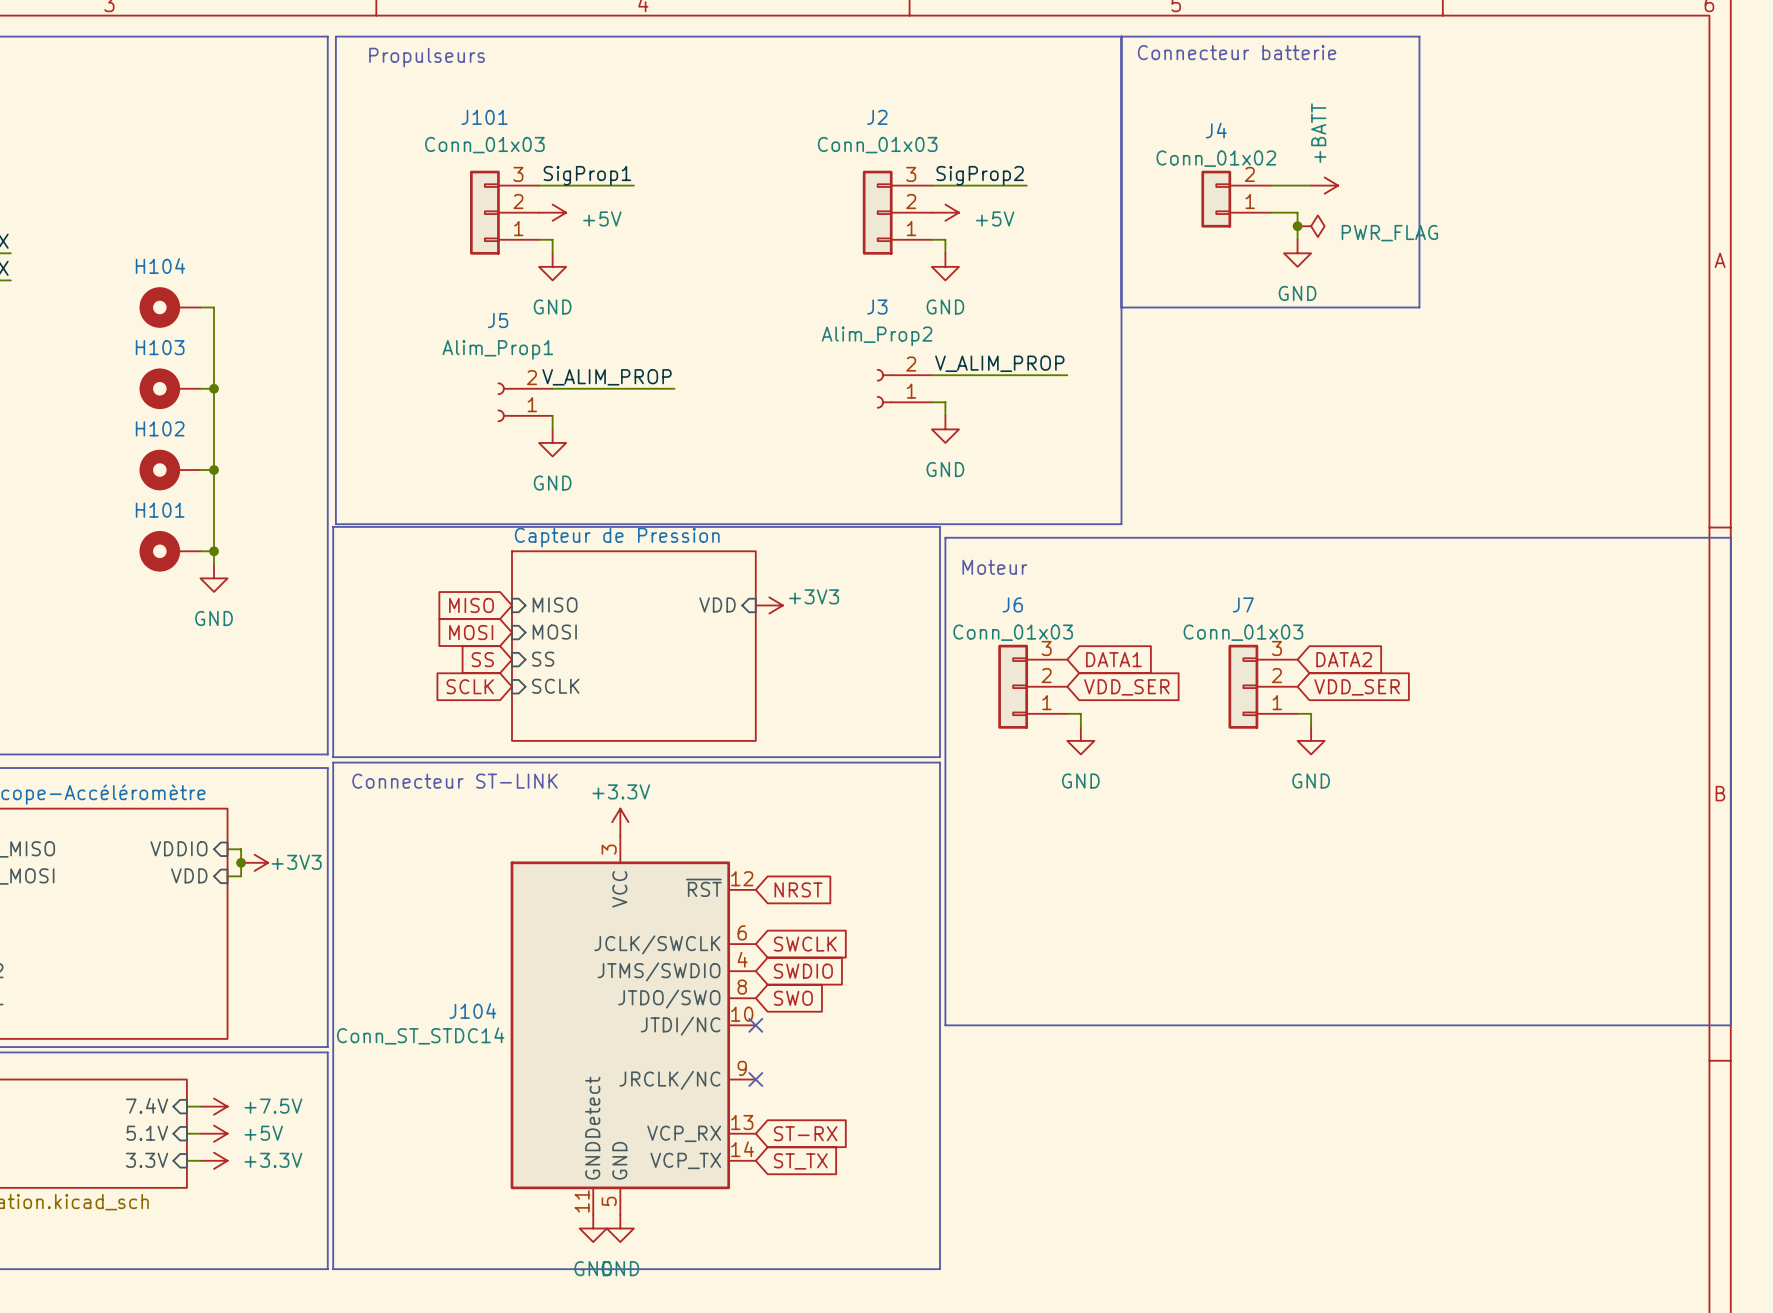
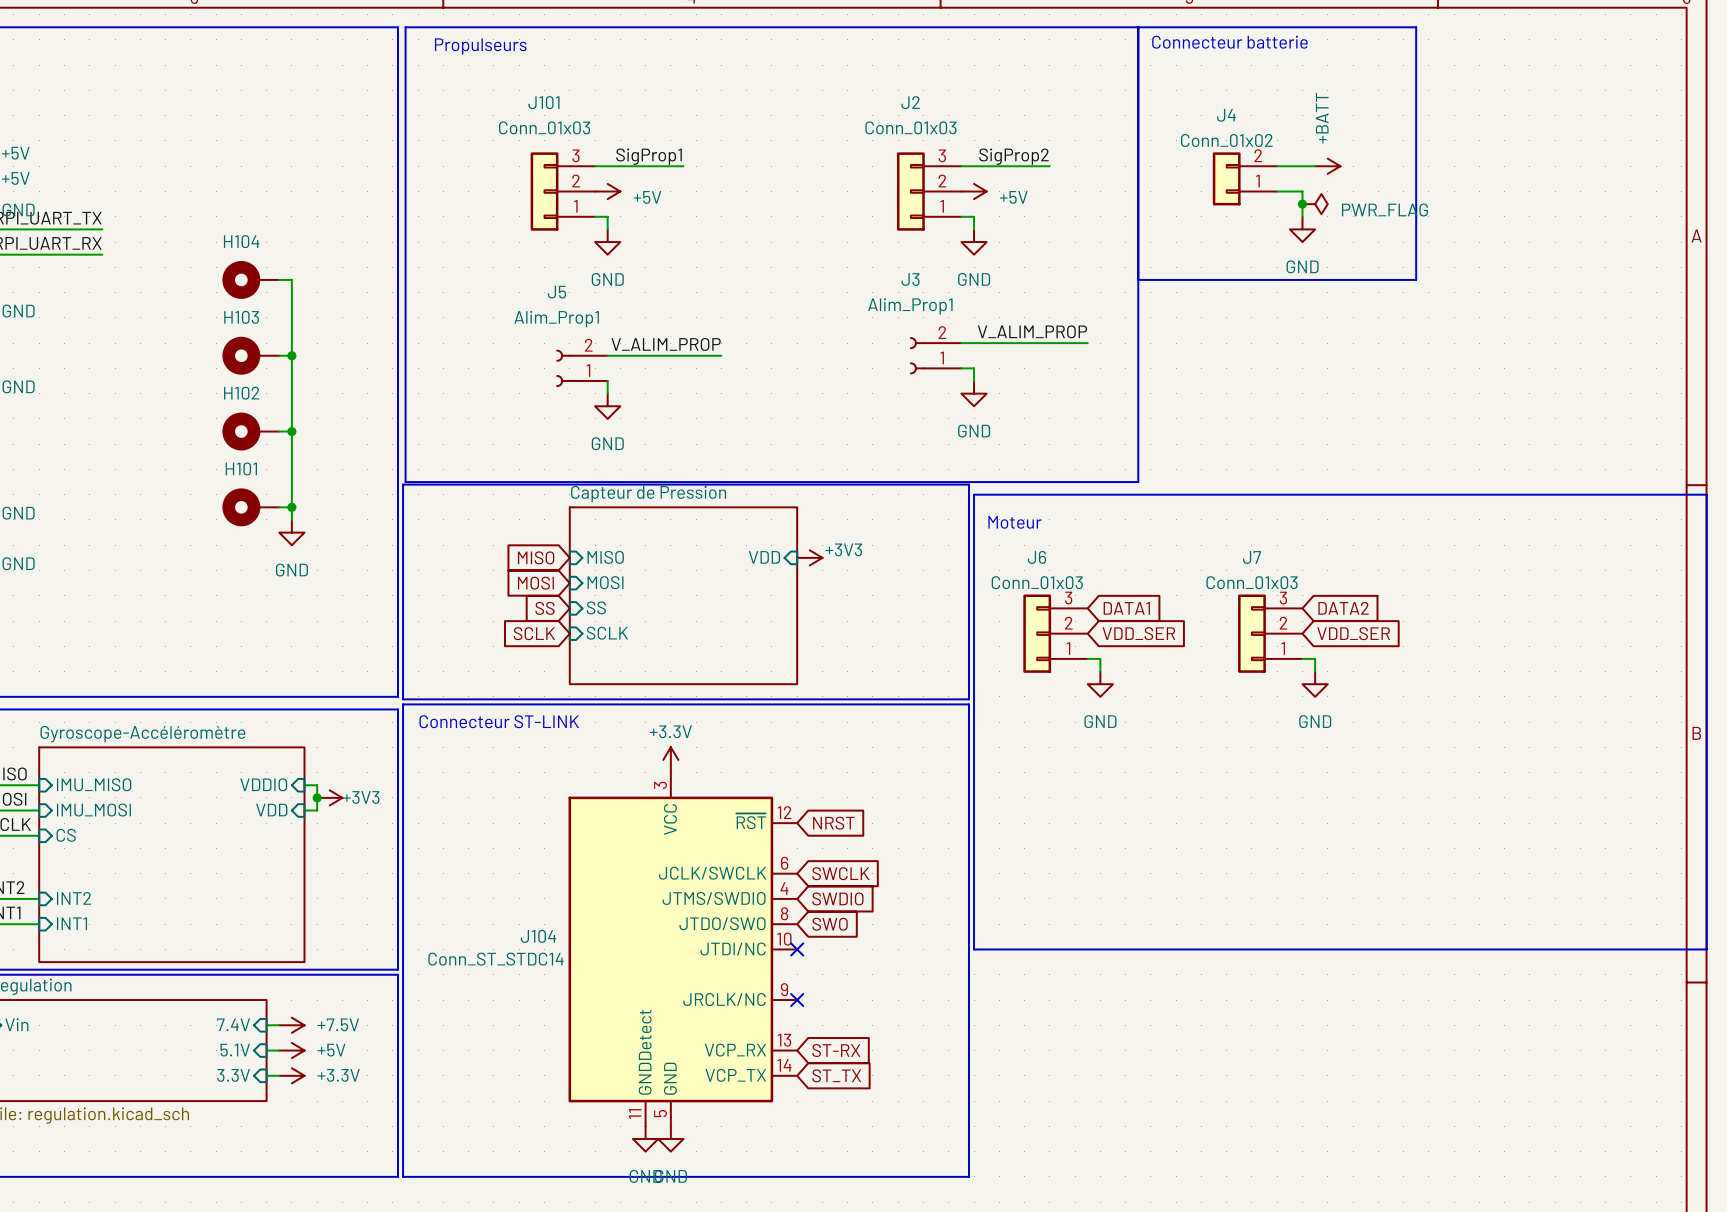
J3 value: Alim_Prop2 (877, 336) -> Alim_Prop1 (910, 306)

